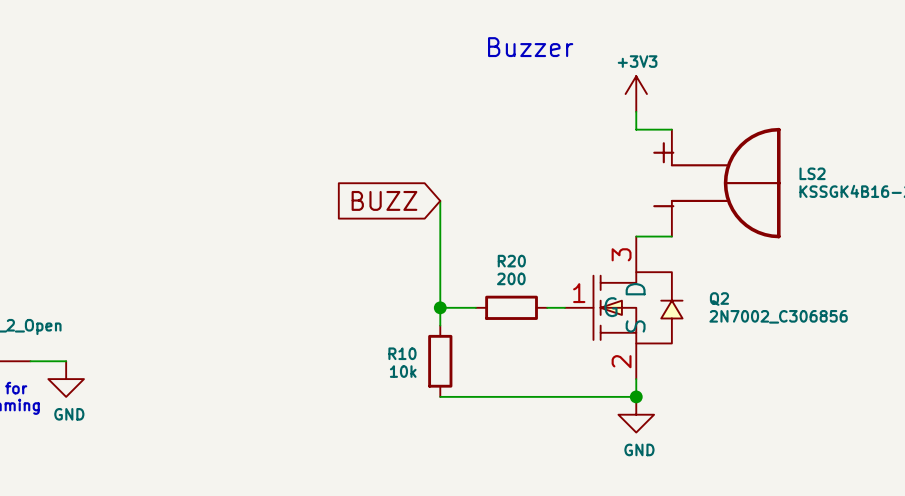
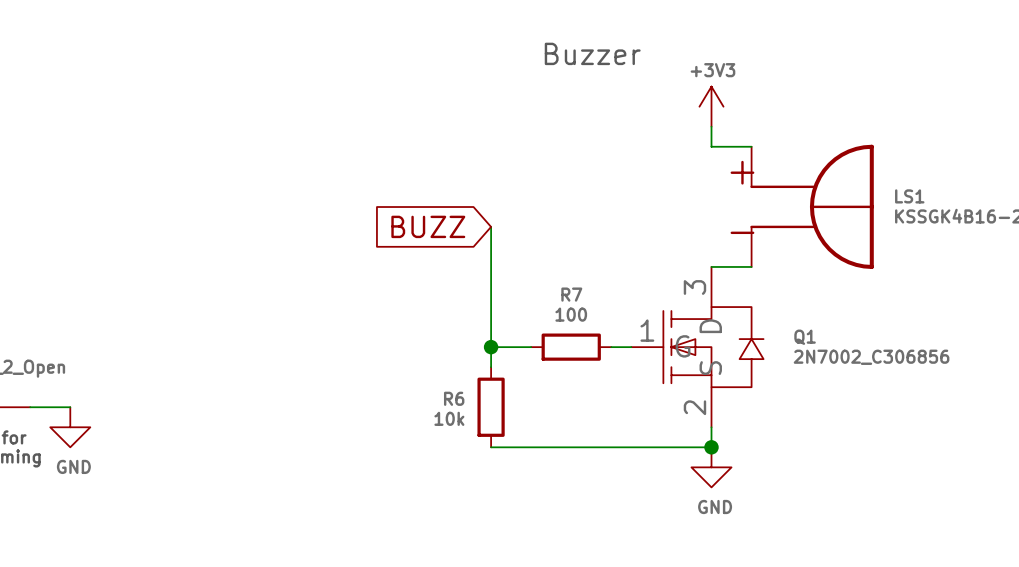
LS2 name: LS2 (812, 173) -> LS1 (909, 196)
R20 name: R20 (511, 261) -> R7 (571, 294)
R20 value: 200 (511, 278) -> 100 (571, 314)
Q2 name: Q2 (719, 299) -> Q1 (805, 337)
R10 name: R10 (402, 353) -> R6 (454, 398)

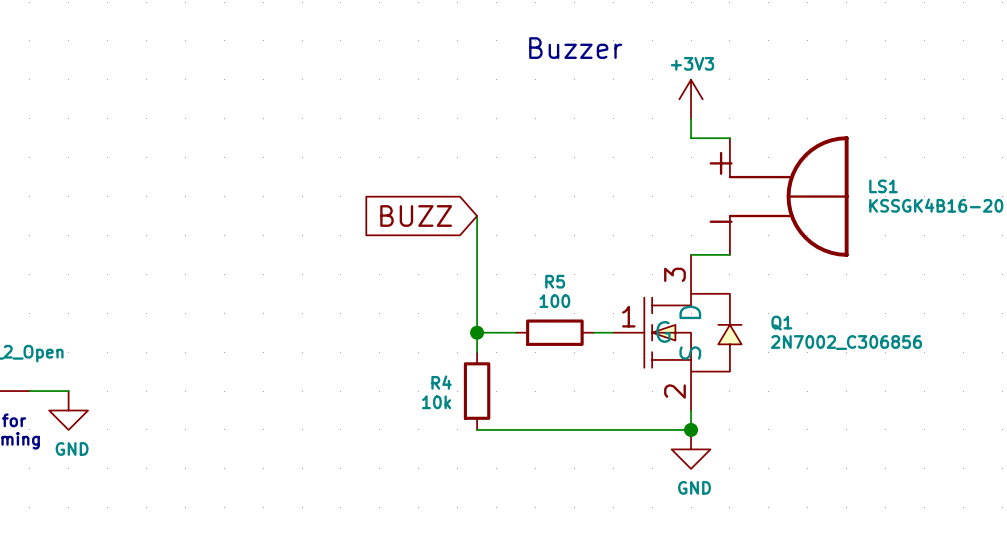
R7 name: R7 (571, 294) -> R5 (555, 281)
R6 name: R6 (454, 398) -> R4 (441, 382)

